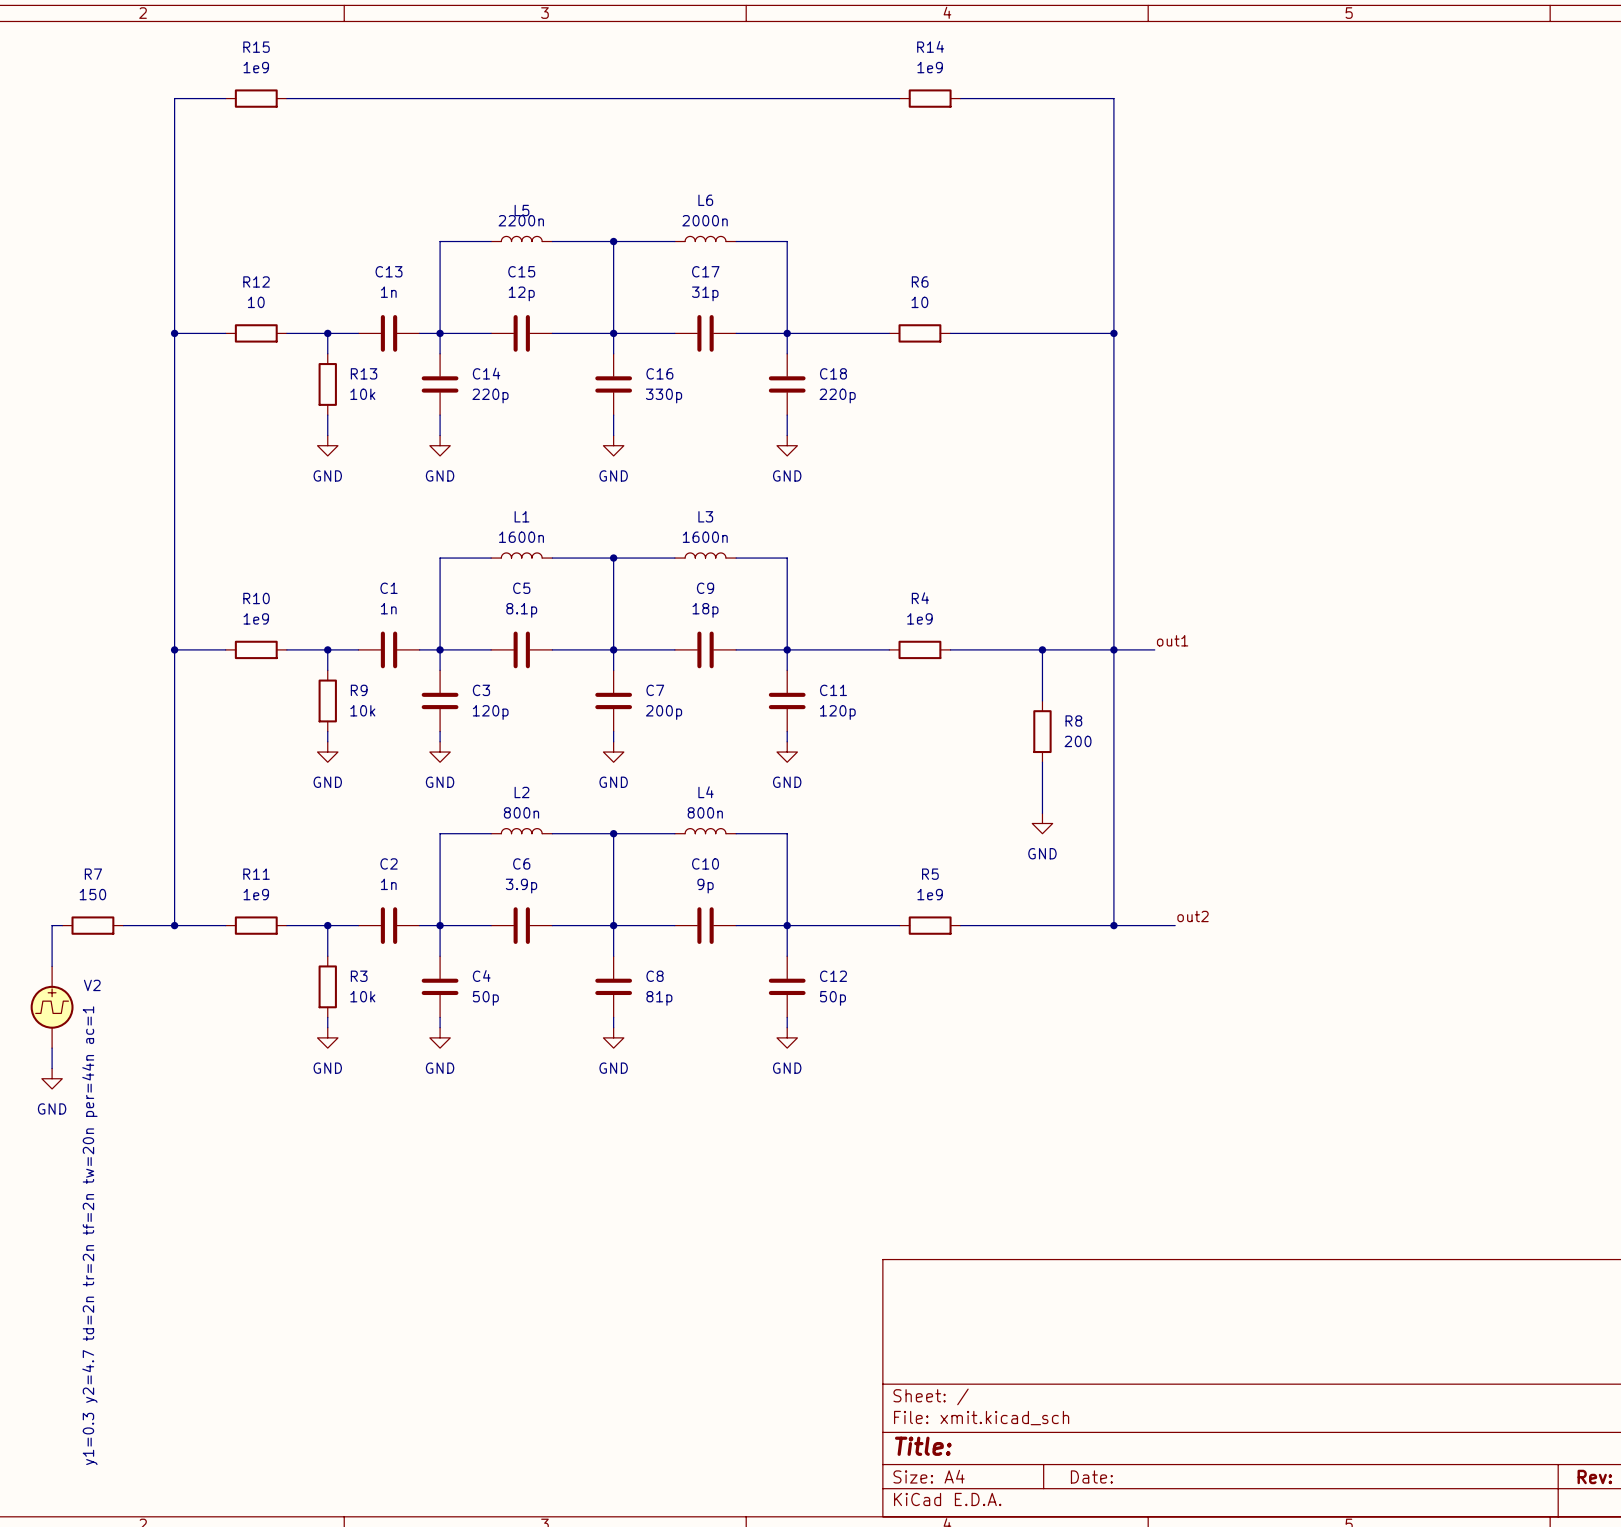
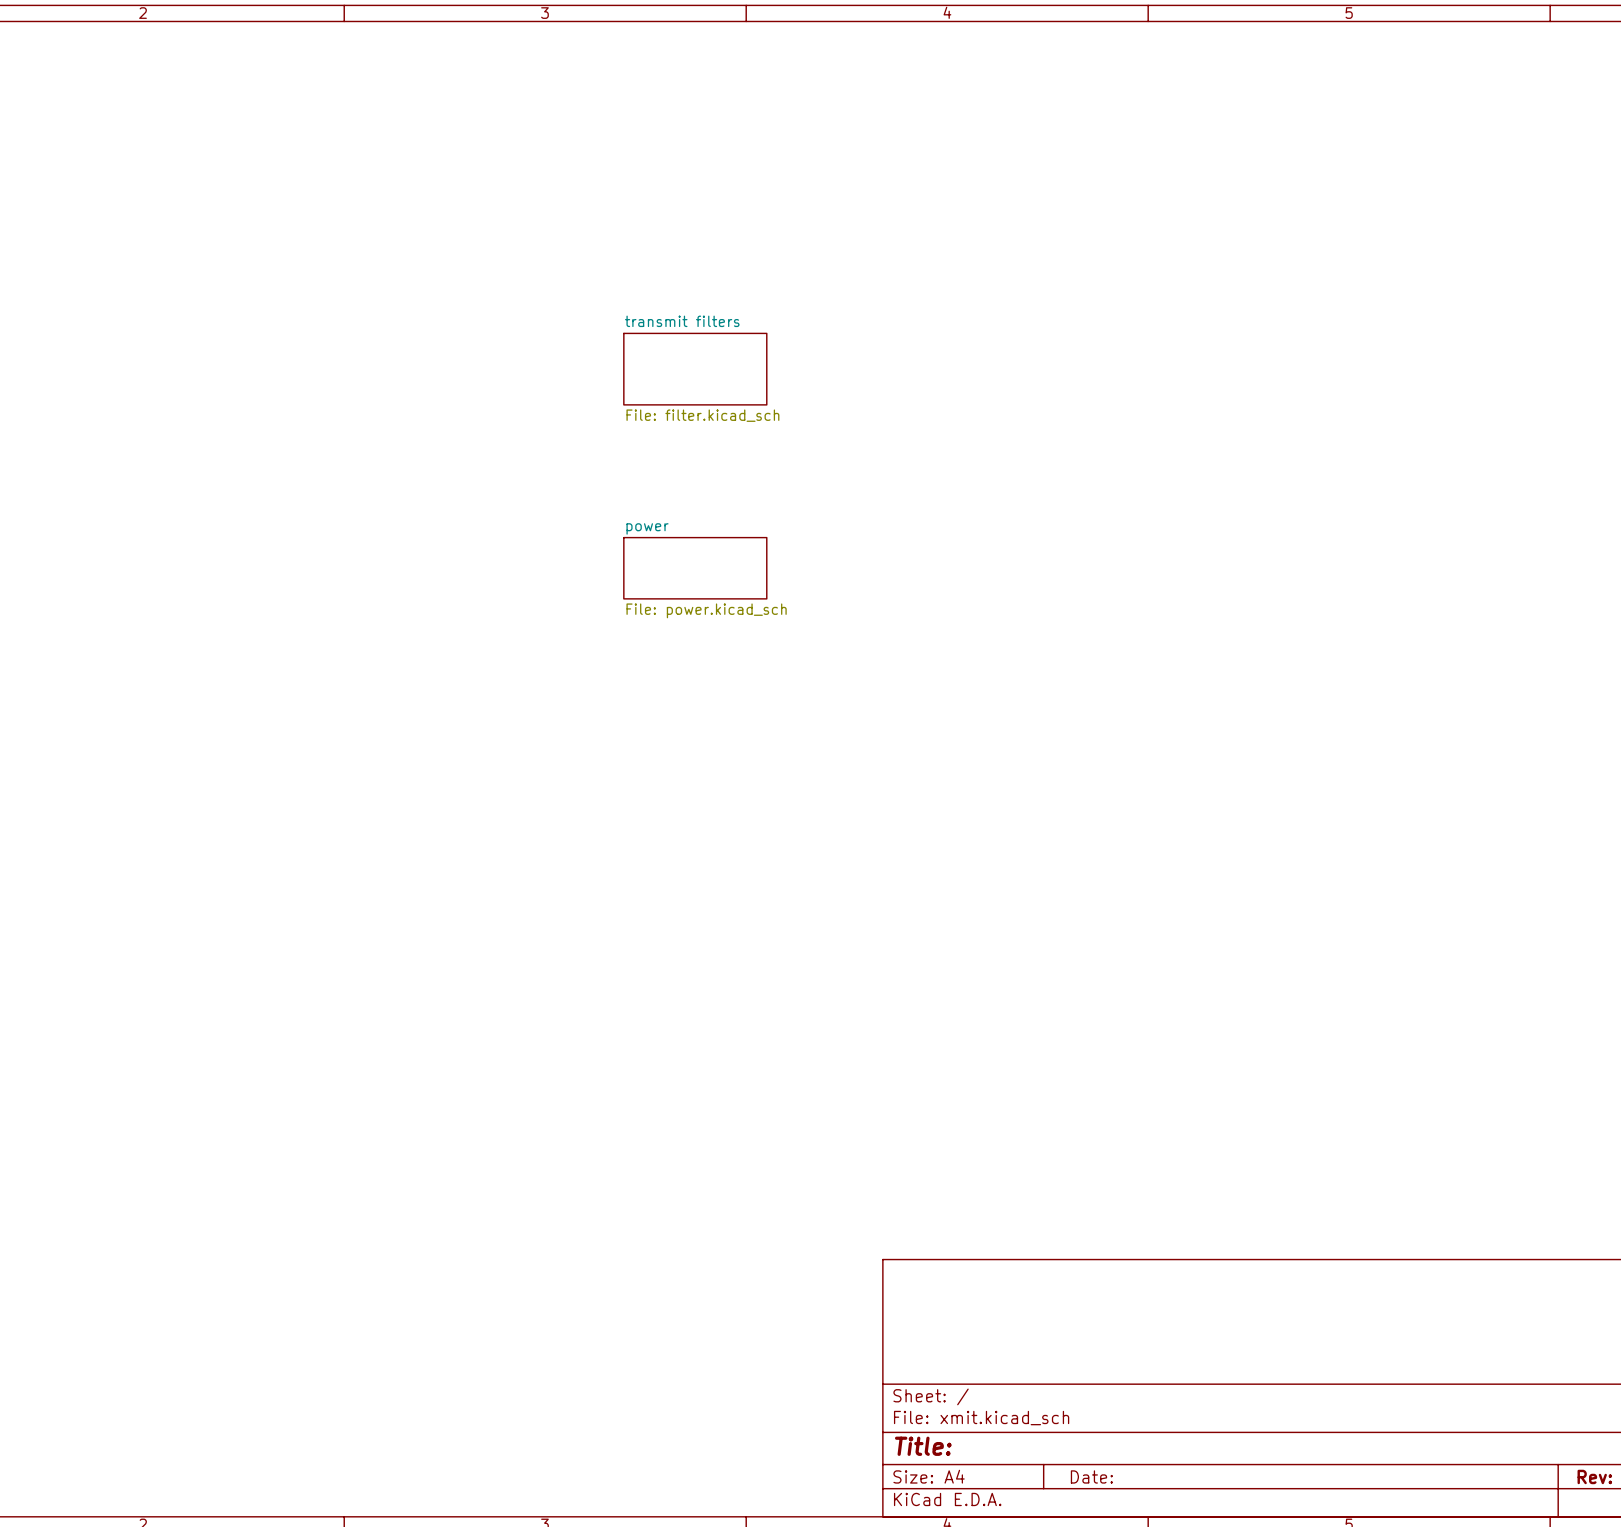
wire: (225, 98) (174, 98) (174, 925) -> none
R15: 1e9 (256, 98) -> none
wire: (286, 98) (899, 98) -> none
R14: 1e9 (930, 98) -> none
wire: (960, 98) (1113, 98) (1113, 925) -> none
L5: 2200n (521, 238) -> none
L6: 2000n (705, 238) -> none
wire: (491, 241) (440, 241) (440, 353) -> none
wire: (552, 241) (674, 241) -> none
wire: (613, 241) (613, 353) -> none
junction: (613, 241) -> none
wire: (736, 241) (787, 241) (787, 353) -> none
wire: (174, 333) (225, 333) -> none
junction: (174, 333) -> none
R12: 10 (256, 333) -> none
wire: (286, 333) (358, 333) -> none
wire: (327, 333) (327, 353) -> none
junction: (327, 333) -> none
C13: 1n (389, 333) -> none
wire: (419, 333) (491, 333) -> none
junction: (440, 333) -> none
C15: 12p (521, 333) -> none
wire: (552, 333) (674, 333) -> none
junction: (613, 333) -> none
C17: 31p (705, 333) -> none
wire: (736, 333) (889, 333) -> none
junction: (787, 333) -> none
R6: 10 (919, 333) -> none
wire: (950, 333) (1113, 333) -> none
junction: (1113, 333) -> none
sheet transmit filters: none -> File: filter.kicad_sch (695, 369)
R13: 10k (327, 384) -> none
C14: 220p (440, 384) -> none
C16: 330p (613, 384) -> none
C18: 220p (787, 384) -> none
wire: (327, 415) (327, 435) -> none
wire: (440, 415) (440, 435) -> none
wire: (613, 415) (613, 435) -> none
wire: (787, 415) (787, 435) -> none
power symbol: GND (327, 445) -> none
power symbol: GND (440, 445) -> none
power symbol: GND (613, 445) -> none
power symbol: GND (787, 445) -> none
L1: 1600n (521, 555) -> none
L3: 1600n (705, 555) -> none
wire: (491, 558) (440, 558) (440, 670) -> none
wire: (552, 558) (674, 558) -> none
wire: (613, 558) (613, 670) -> none
junction: (613, 558) -> none
wire: (736, 558) (787, 558) (787, 670) -> none
sheet power: none -> File: power.kicad_sch (695, 568)
label: out1 (1172, 640) -> none
wire: (174, 649) (225, 649) -> none
junction: (174, 649) -> none
R10: 1e9 (256, 649) -> none
wire: (286, 649) (358, 649) -> none
wire: (327, 649) (327, 670) -> none
junction: (327, 649) -> none
C1: 1n (389, 649) -> none
wire: (419, 649) (491, 649) -> none
junction: (440, 649) -> none
C5: 8.1p (521, 649) -> none
wire: (552, 649) (674, 649) -> none
junction: (613, 649) -> none
C9: 18p (705, 649) -> none
wire: (736, 649) (889, 649) -> none
junction: (787, 649) -> none
R4: 1e9 (919, 649) -> none
wire: (950, 649) (1154, 649) -> none
wire: (1042, 649) (1042, 700) -> none
junction: (1042, 649) -> none
junction: (1113, 649) -> none
R9: 10k (327, 700) -> none
C3: 120p (440, 700) -> none
C7: 200p (613, 700) -> none
C11: 120p (787, 700) -> none
wire: (327, 731) (327, 741) -> none
wire: (440, 731) (440, 741) -> none
wire: (613, 731) (613, 741) -> none
wire: (787, 731) (787, 741) -> none
R8: 200 (1042, 731) -> none
power symbol: GND (327, 752) -> none
power symbol: GND (440, 752) -> none
power symbol: GND (613, 752) -> none
power symbol: GND (787, 752) -> none
wire: (1042, 762) (1042, 813) -> none
power symbol: GND (1042, 823) -> none
L2: 800n (521, 831) -> none
L4: 800n (705, 831) -> none
wire: (491, 833) (440, 833) (440, 956) -> none
wire: (552, 833) (674, 833) -> none
wire: (613, 833) (613, 956) -> none
junction: (613, 833) -> none
wire: (736, 833) (787, 833) (787, 956) -> none
label: out2 (1193, 916) -> none
wire: (62, 925) (52, 925) (52, 966) -> none
R7: 150 (92, 925) -> none
wire: (123, 925) (225, 925) -> none
junction: (174, 925) -> none
R11: 1e9 (256, 925) -> none
wire: (286, 925) (358, 925) -> none
wire: (327, 925) (327, 956) -> none
junction: (327, 925) -> none
C2: 1n (389, 925) -> none
wire: (419, 925) (491, 925) -> none
junction: (440, 925) -> none
C6: 3.9p (521, 925) -> none
wire: (552, 925) (674, 925) -> none
junction: (613, 925) -> none
C10: 9p (705, 925) -> none
wire: (736, 925) (899, 925) -> none
junction: (787, 925) -> none
R5: 1e9 (930, 925) -> none
wire: (960, 925) (1175, 925) -> none
junction: (1113, 925) -> none
R3: 10k (327, 986) -> none
C4: 50p (440, 986) -> none
C8: 81p (613, 986) -> none
C12: 50p (787, 986) -> none
V2: (52, 1007) -> none
wire: (327, 1017) (327, 1027) -> none
wire: (440, 1017) (440, 1027) -> none
wire: (613, 1017) (613, 1027) -> none
wire: (787, 1017) (787, 1027) -> none
power symbol: GND (327, 1037) -> none
power symbol: GND (440, 1037) -> none
power symbol: GND (613, 1037) -> none
power symbol: GND (787, 1037) -> none
wire: (52, 1048) (52, 1068) -> none
power symbol: GND (52, 1078) -> none

